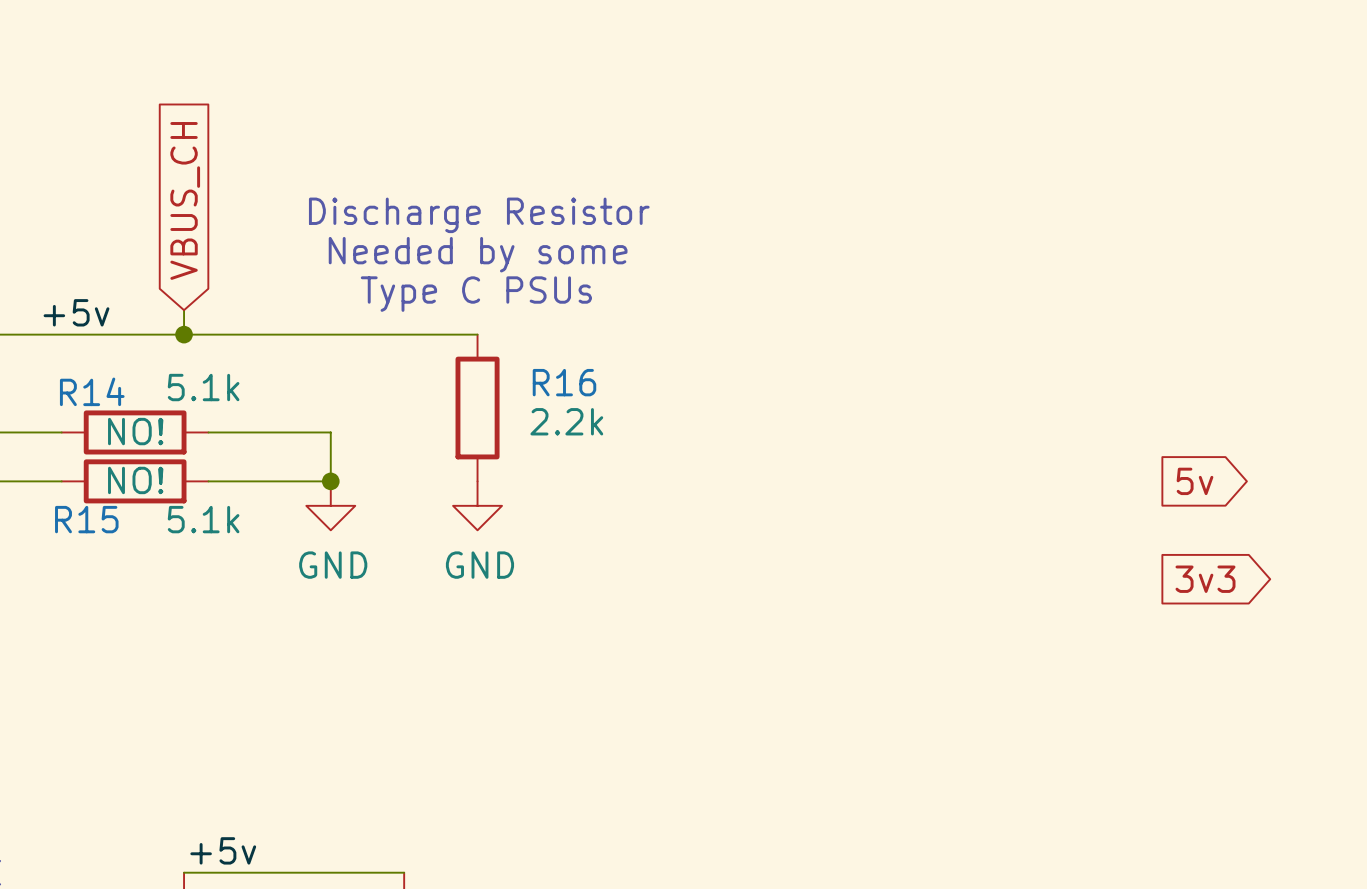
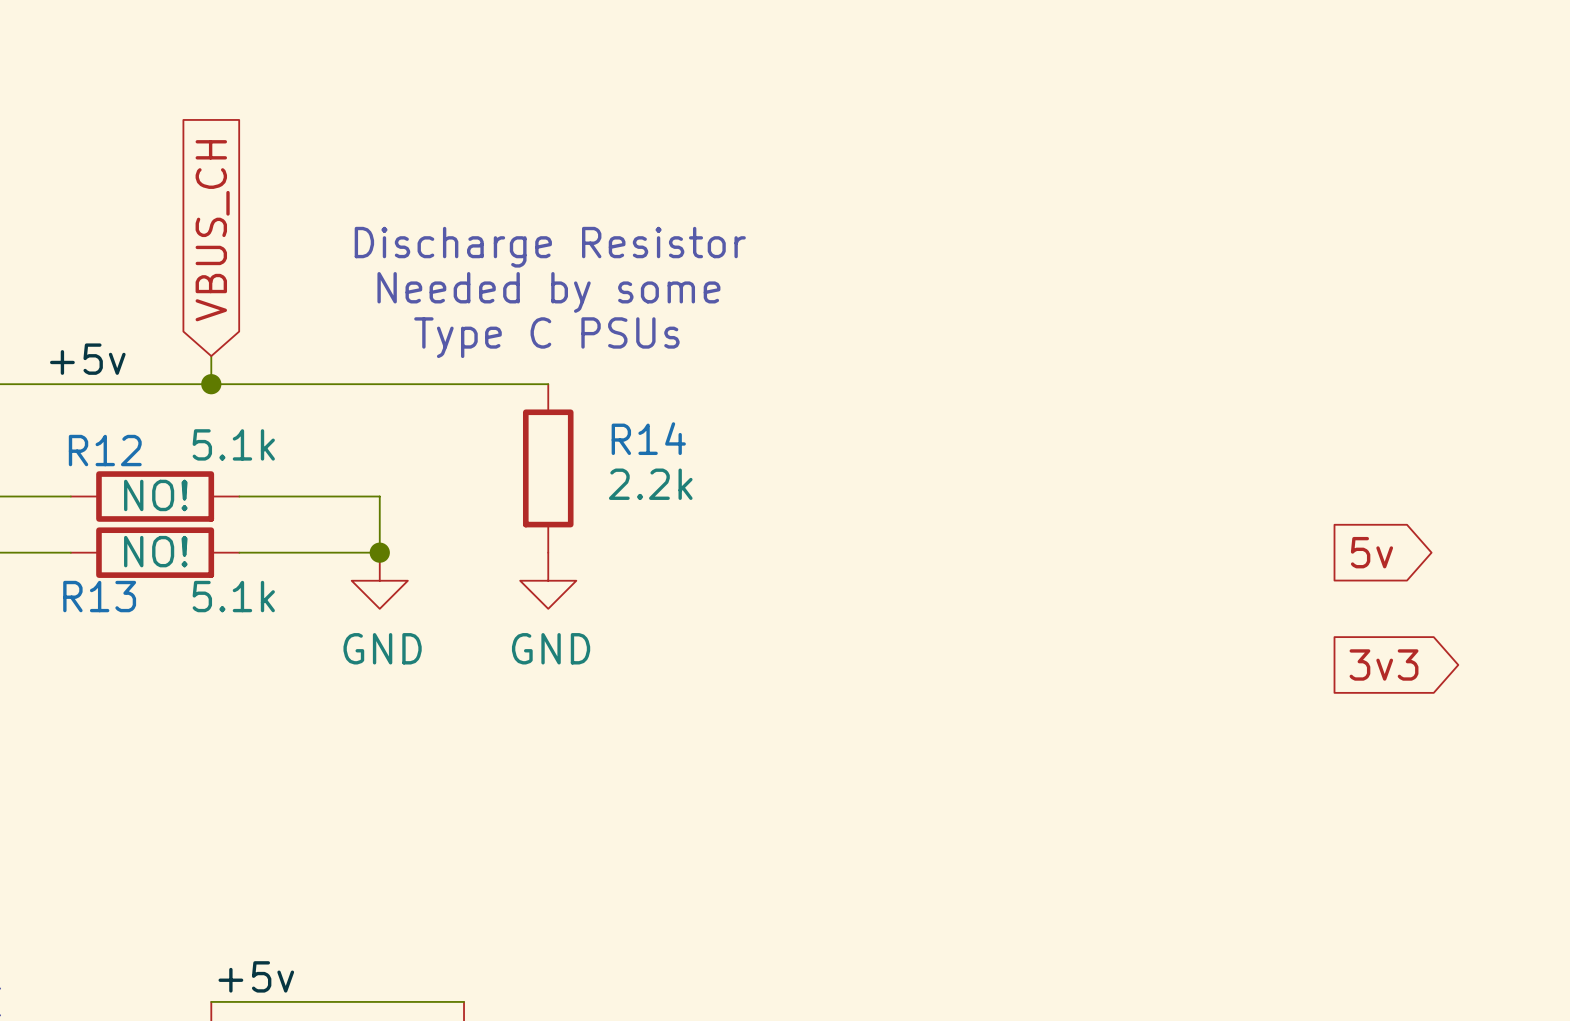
R16 name: R16 (564, 382) -> R14 (648, 438)
R14 name: R14 (92, 391) -> R12 (105, 450)
R15 name: R15 (86, 519) -> R13 (99, 596)

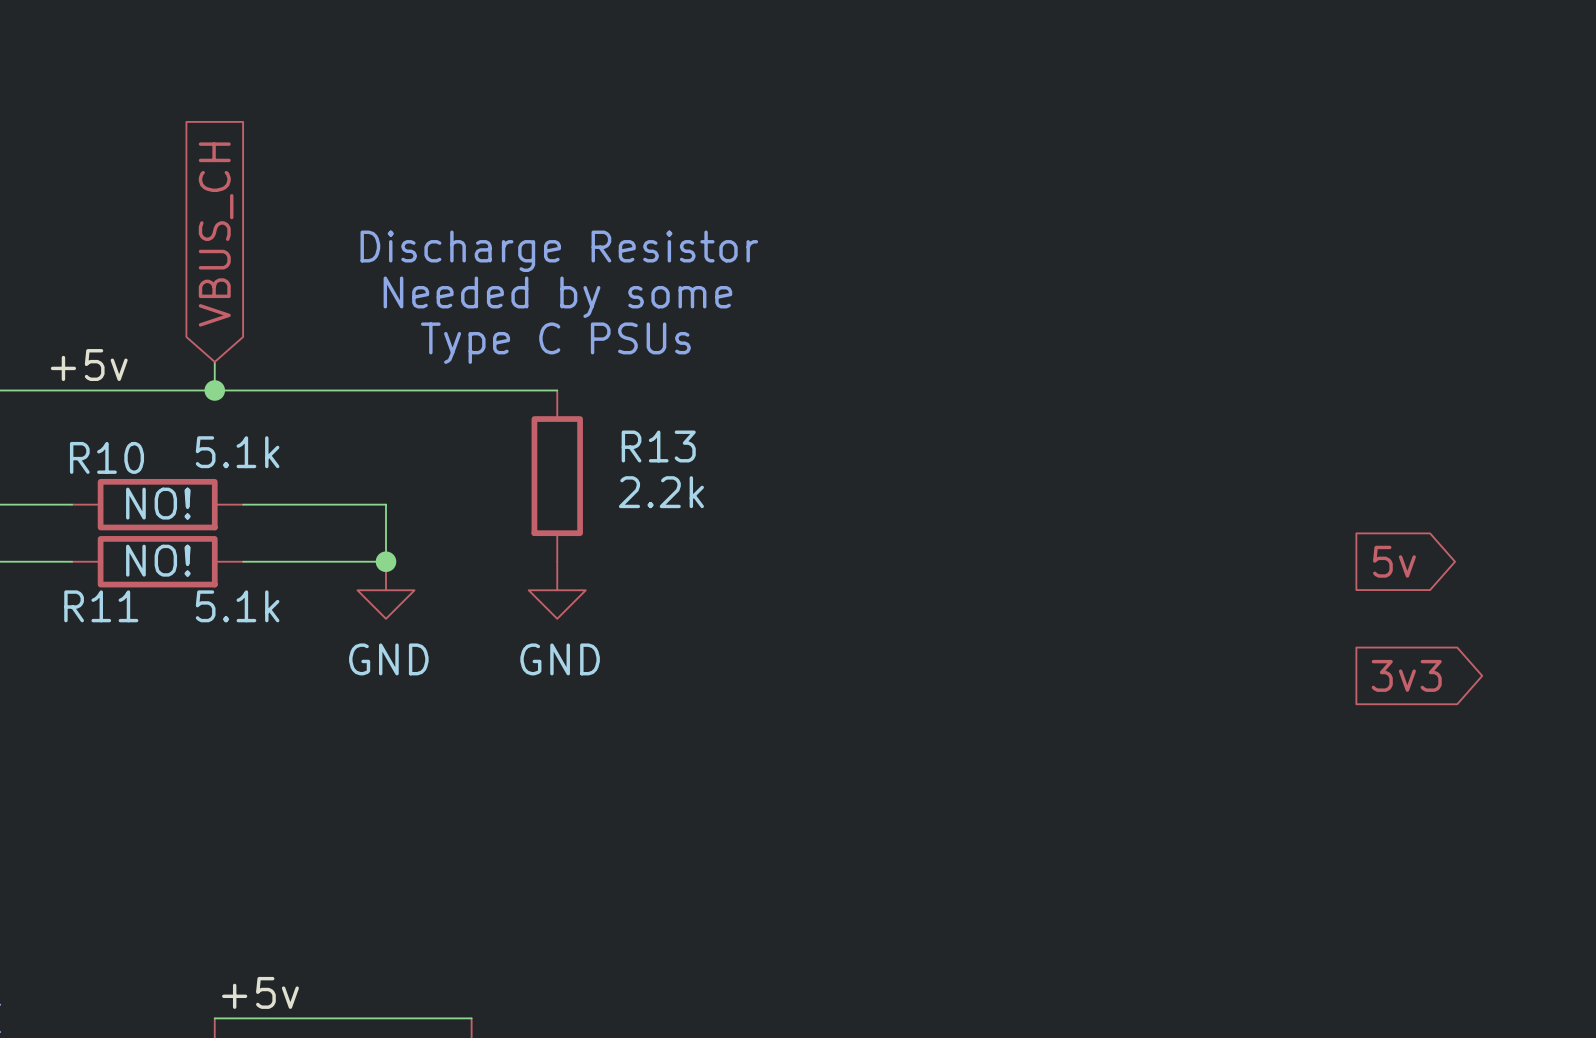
R14 name: R14 (648, 438) -> R13 (658, 446)
R12 name: R12 (105, 450) -> R10 (106, 457)
R13 name: R13 (99, 596) -> R11 (101, 606)

